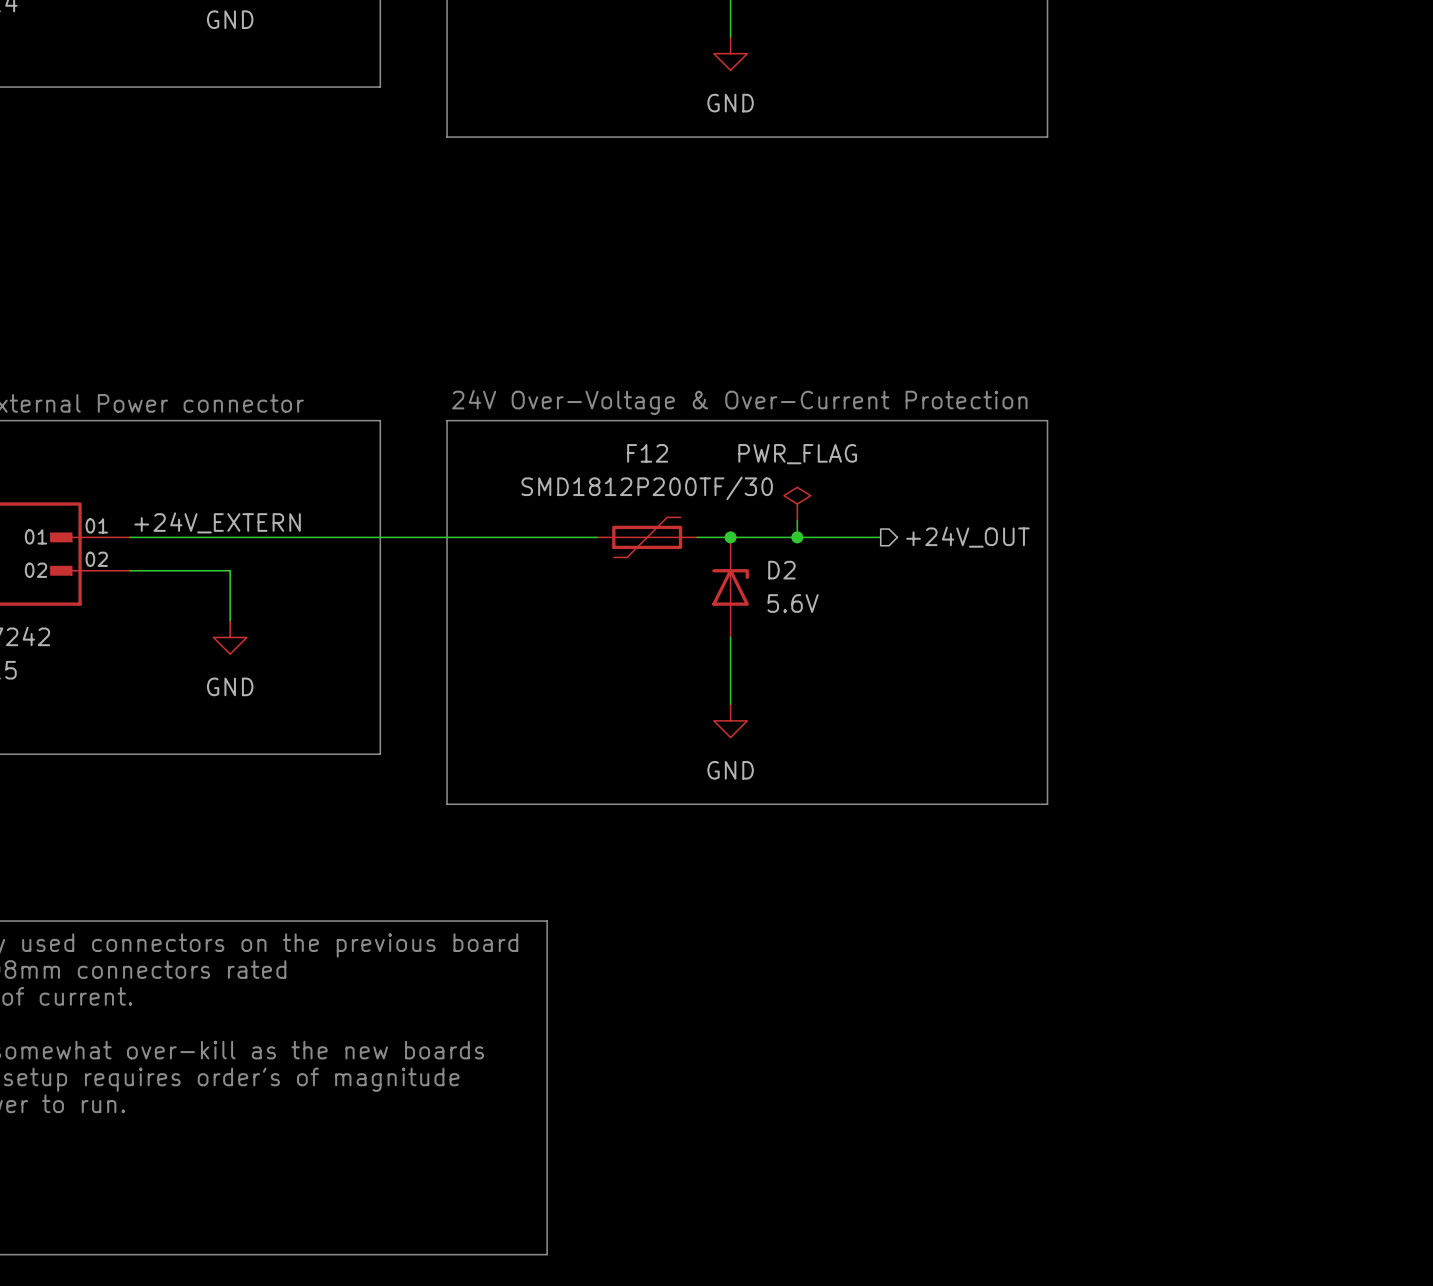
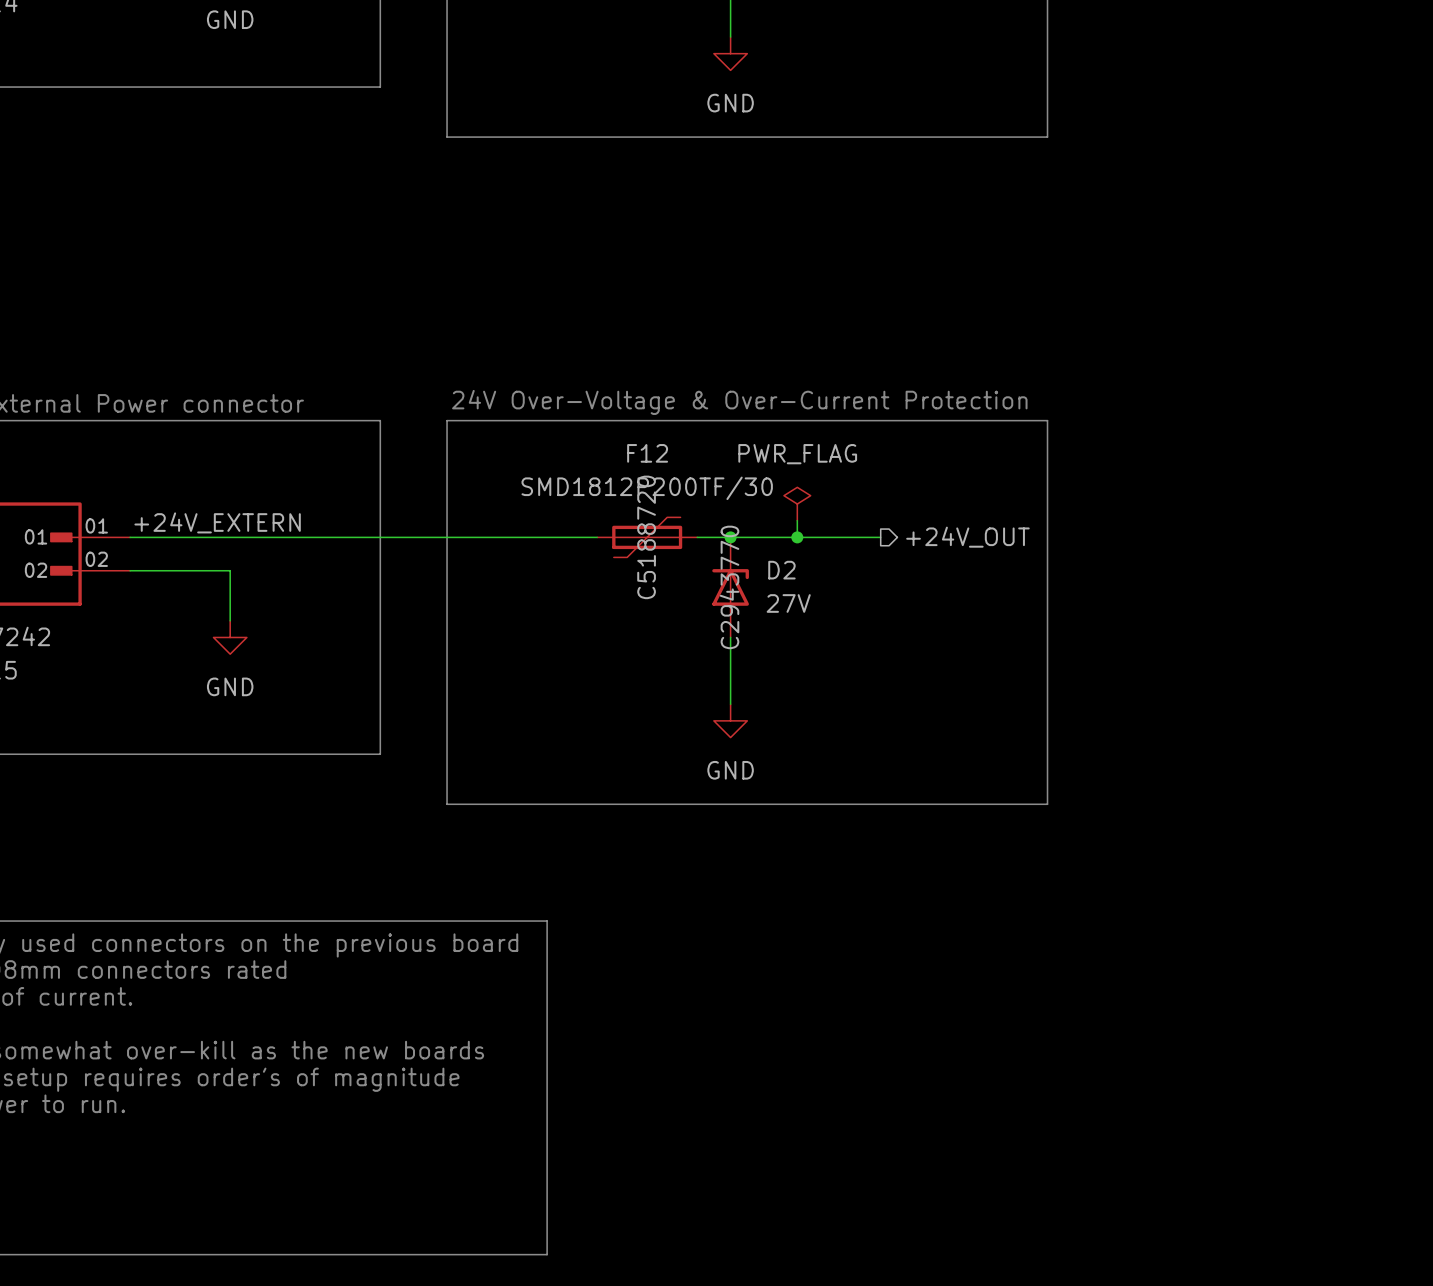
F12 text: none -> C5188720 (646, 537)
D2 text: none -> C2943770 (729, 587)
D2 value: 5.6V (793, 603) -> 27V (788, 603)

